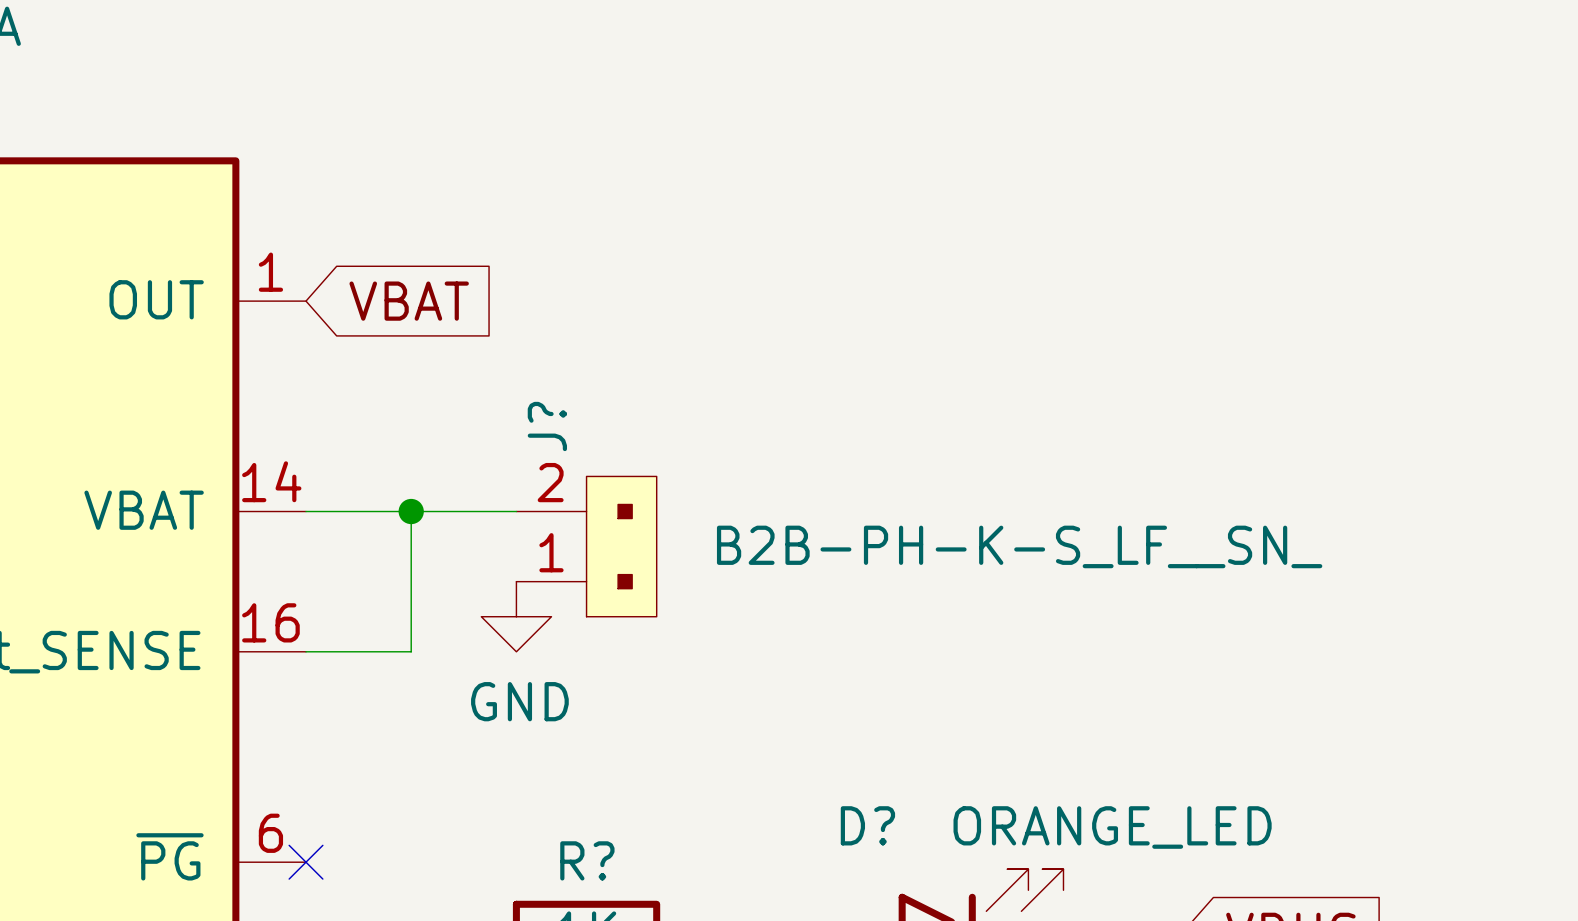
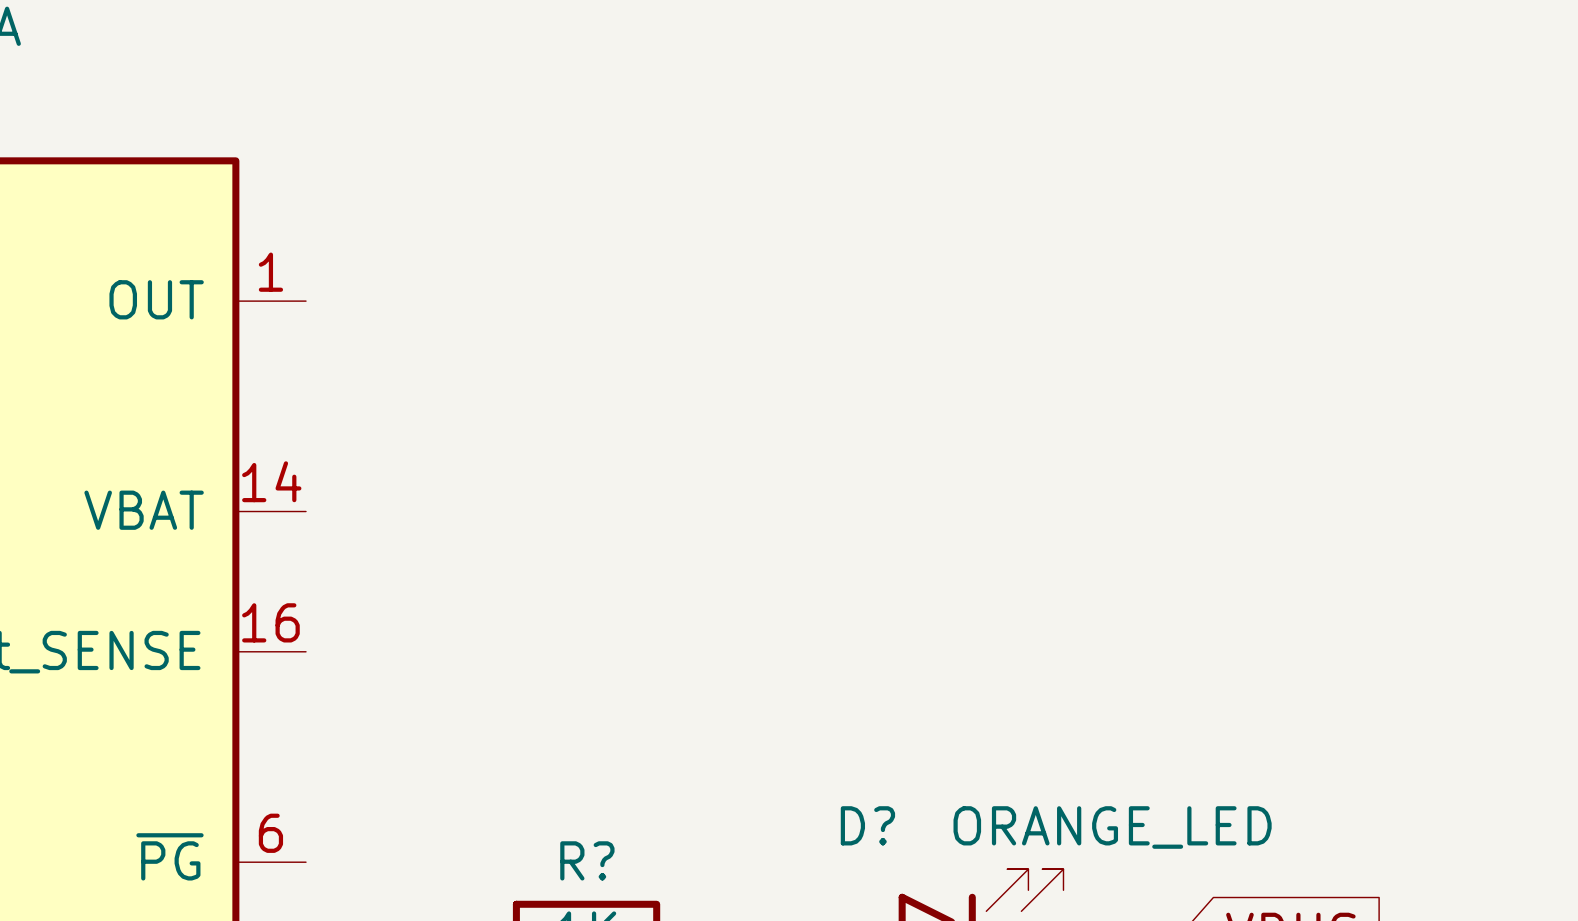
global label: VBAT (409, 301) -> none
wire: (306, 511) (516, 511) -> none
wire: (411, 511) (411, 651) (306, 651) -> none
junction: (411, 511) -> none
J?: B2B-PH-K-S_LF__SN_ (586, 546) -> none
power symbol: GND (516, 616) -> none
no-connect mark: (306, 862) -> none

